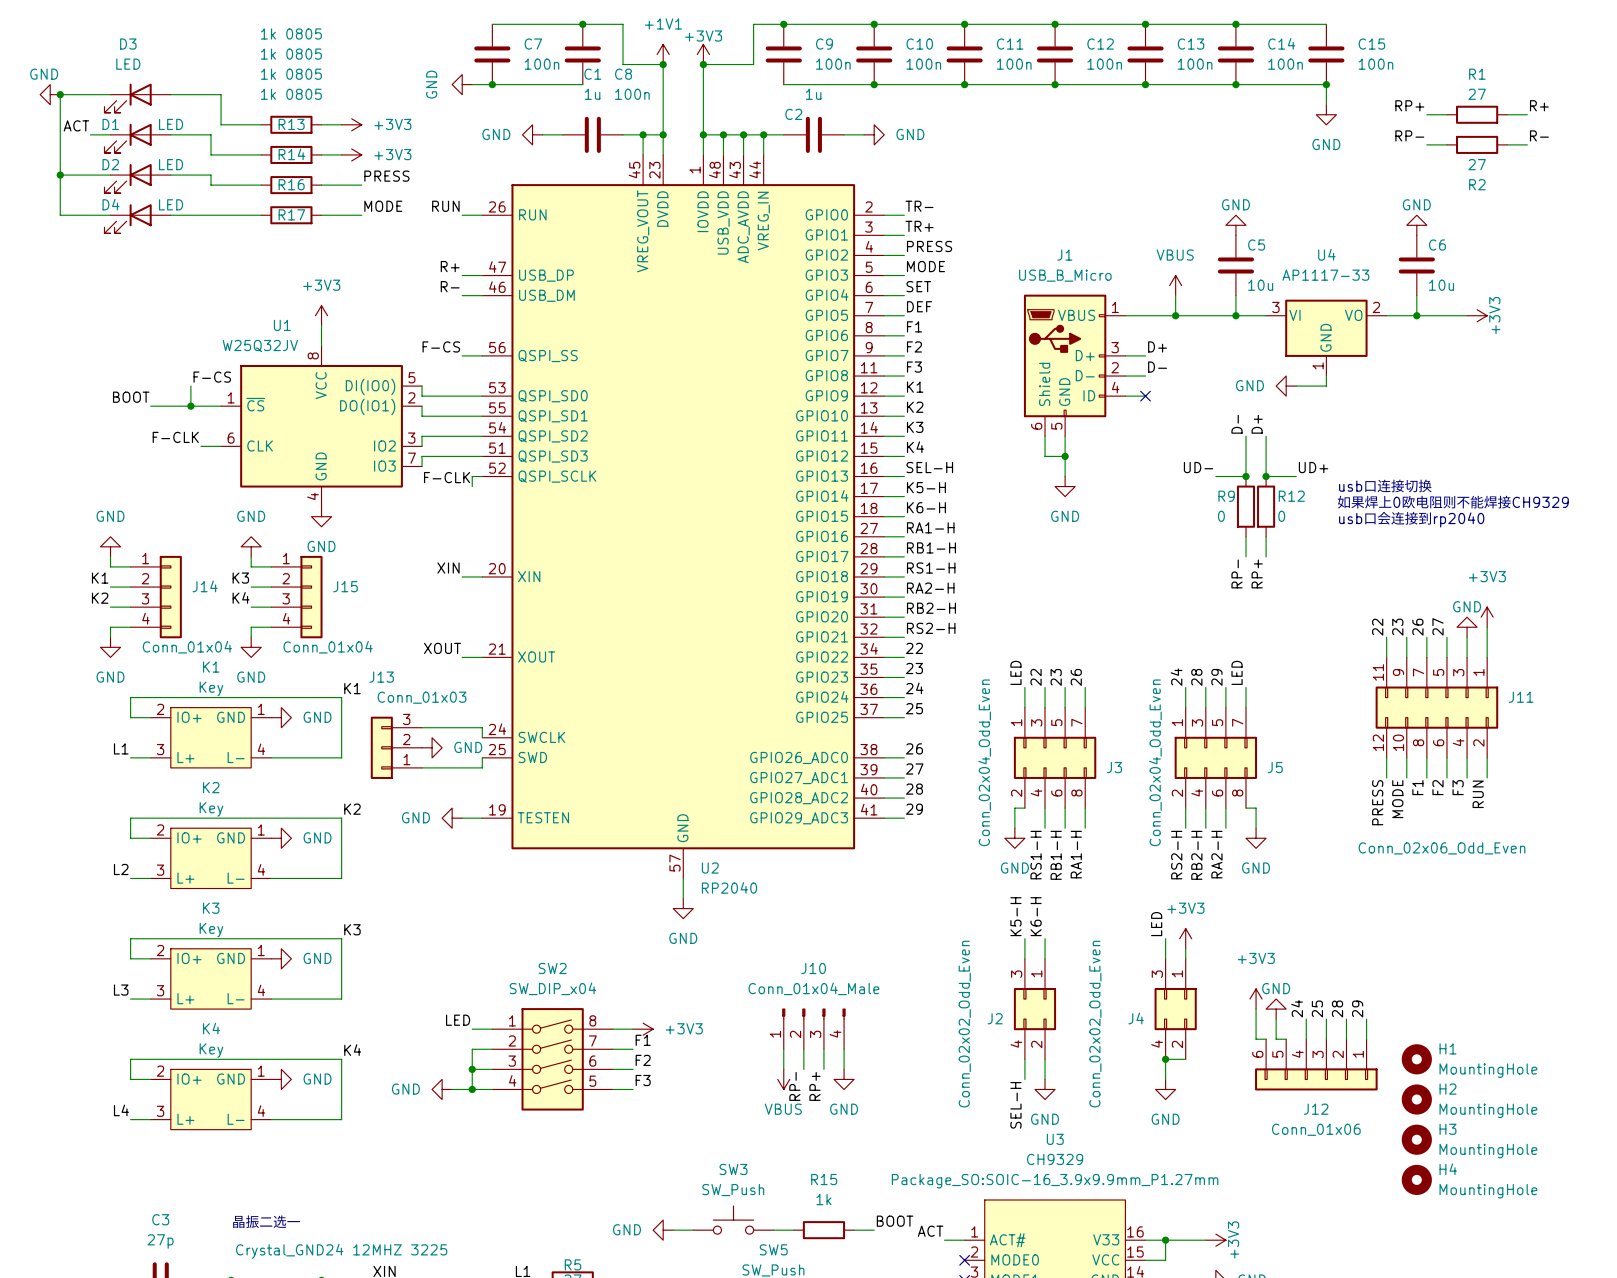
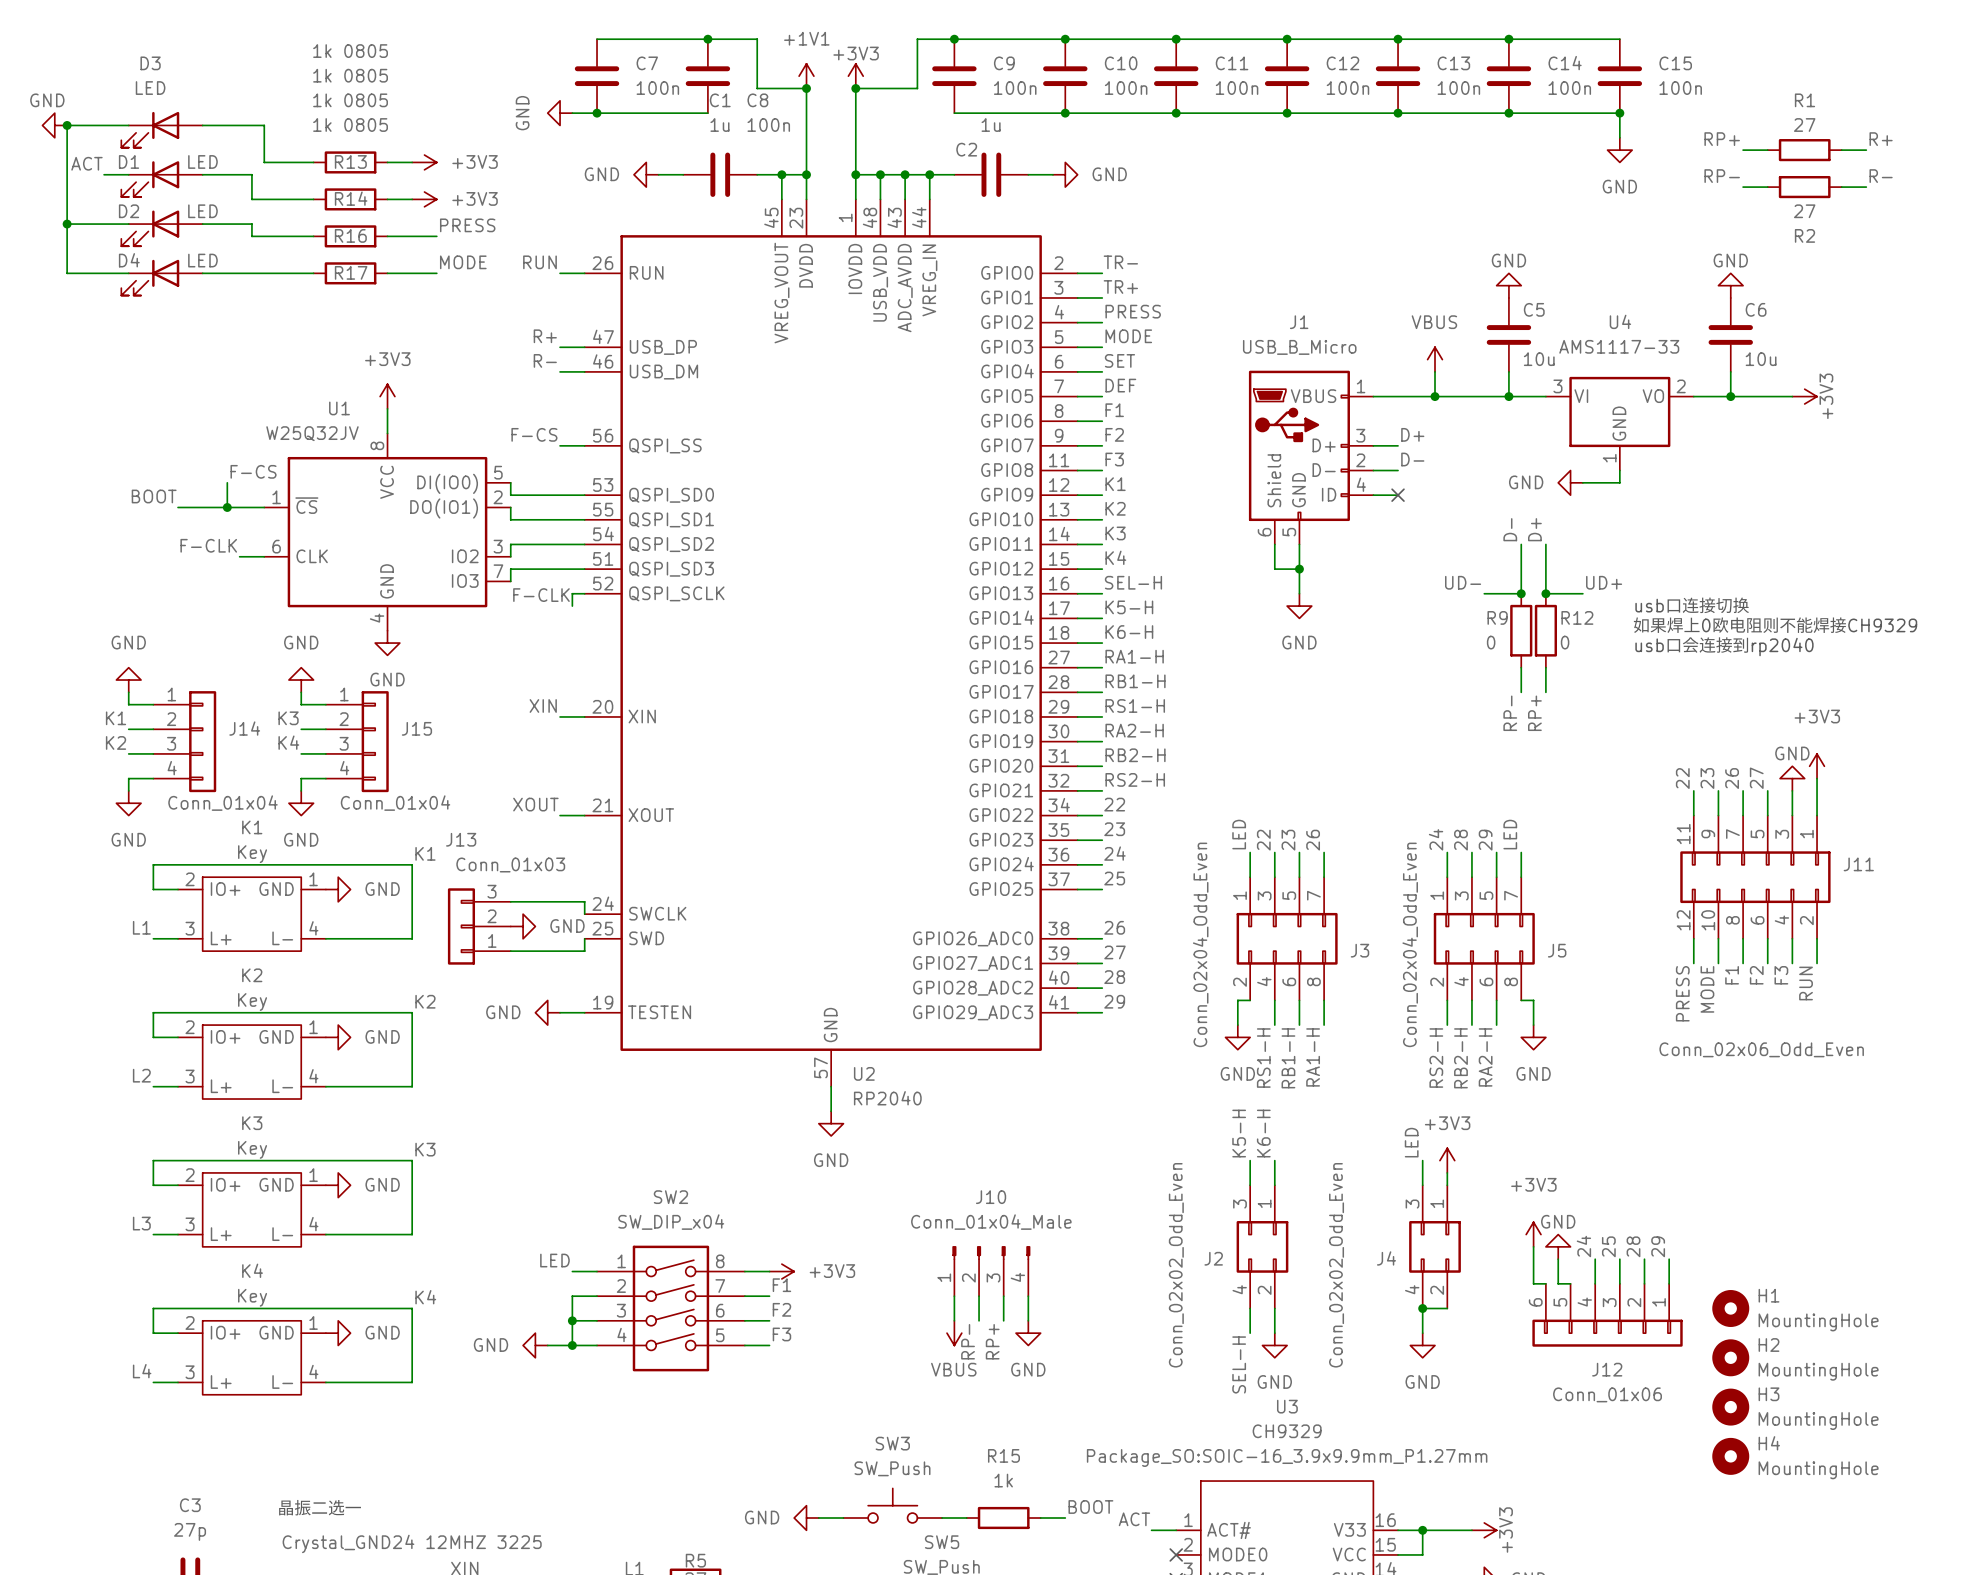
U4 value: AP1117-33 (1325, 275) -> AMS1117-33 (1619, 346)

